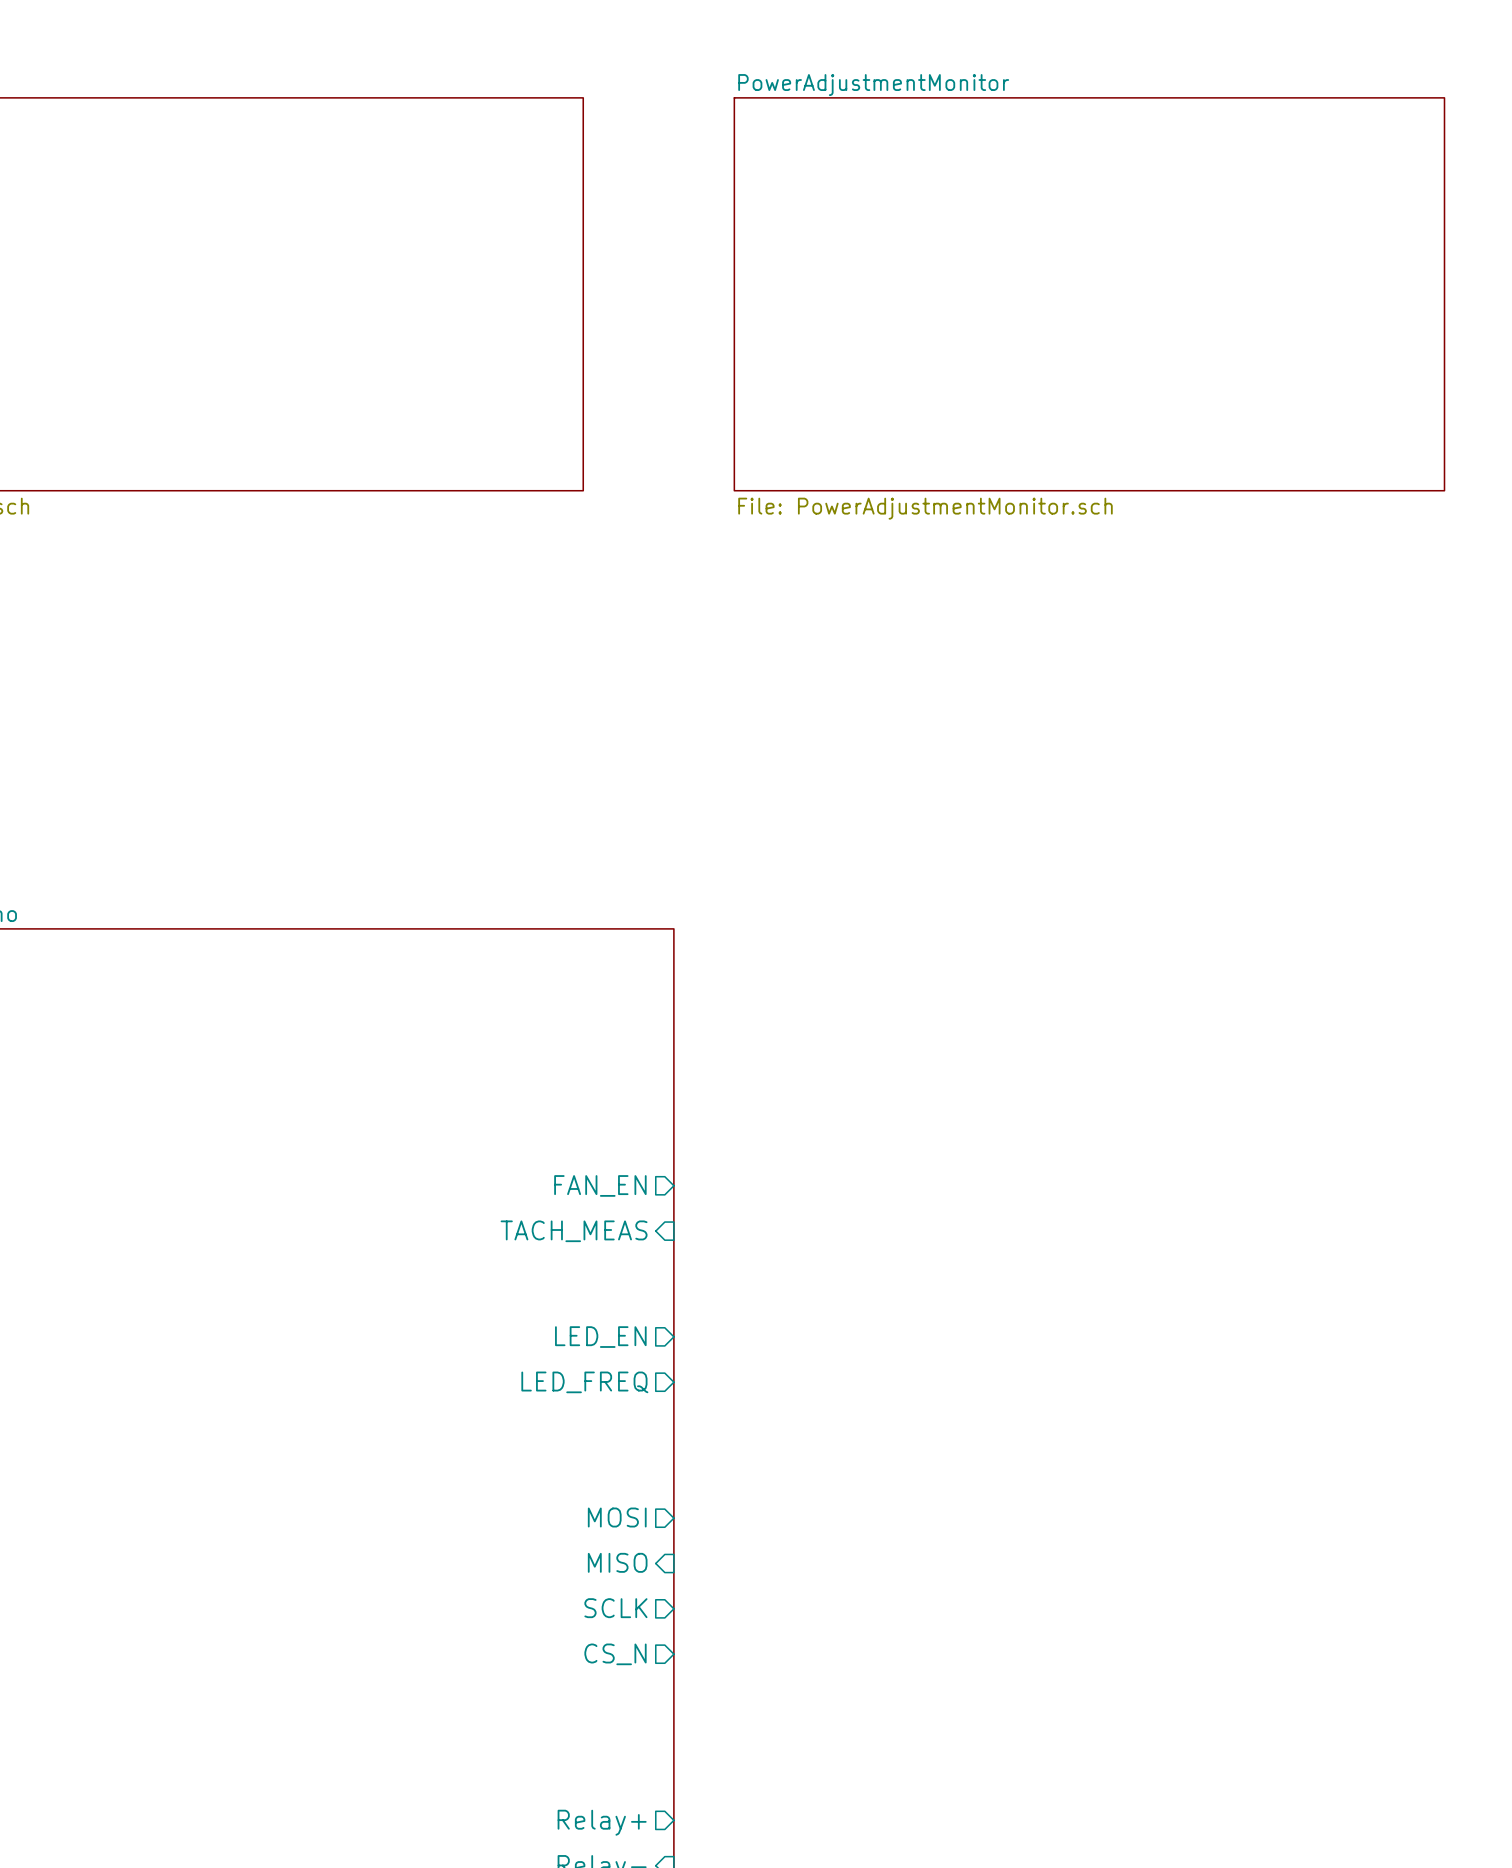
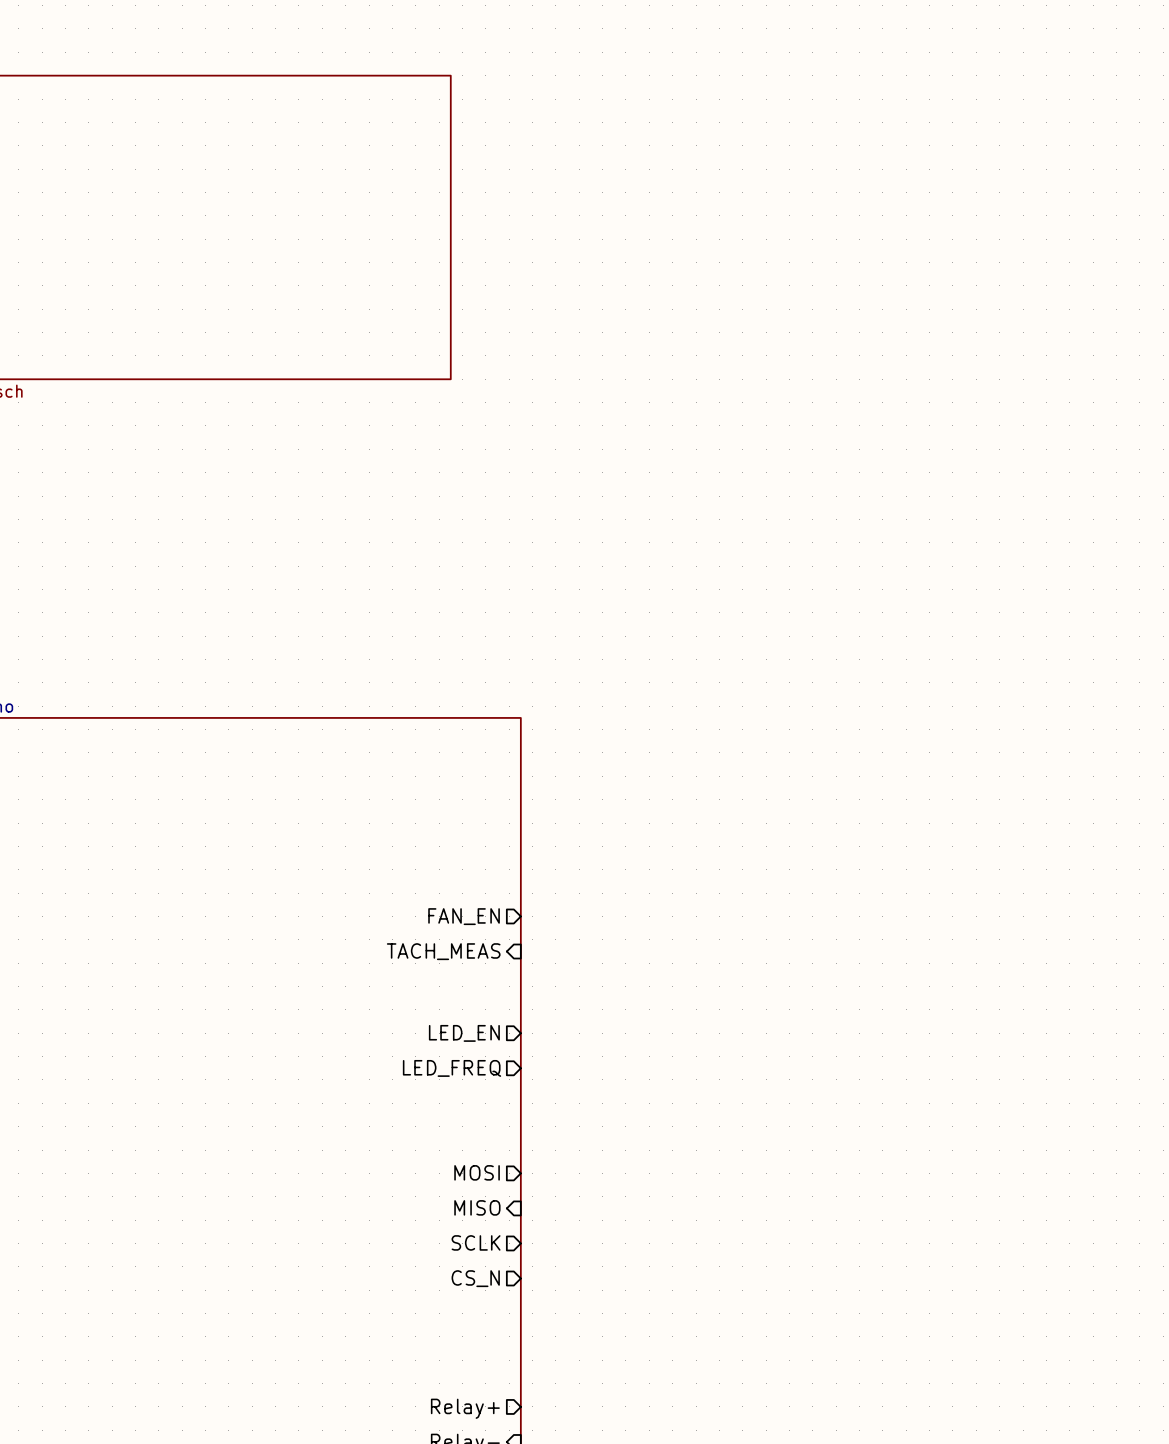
sheet PowerAdjustmentMonitor: File: PowerAdjustmentMonitor.sch (1089, 294) -> none

